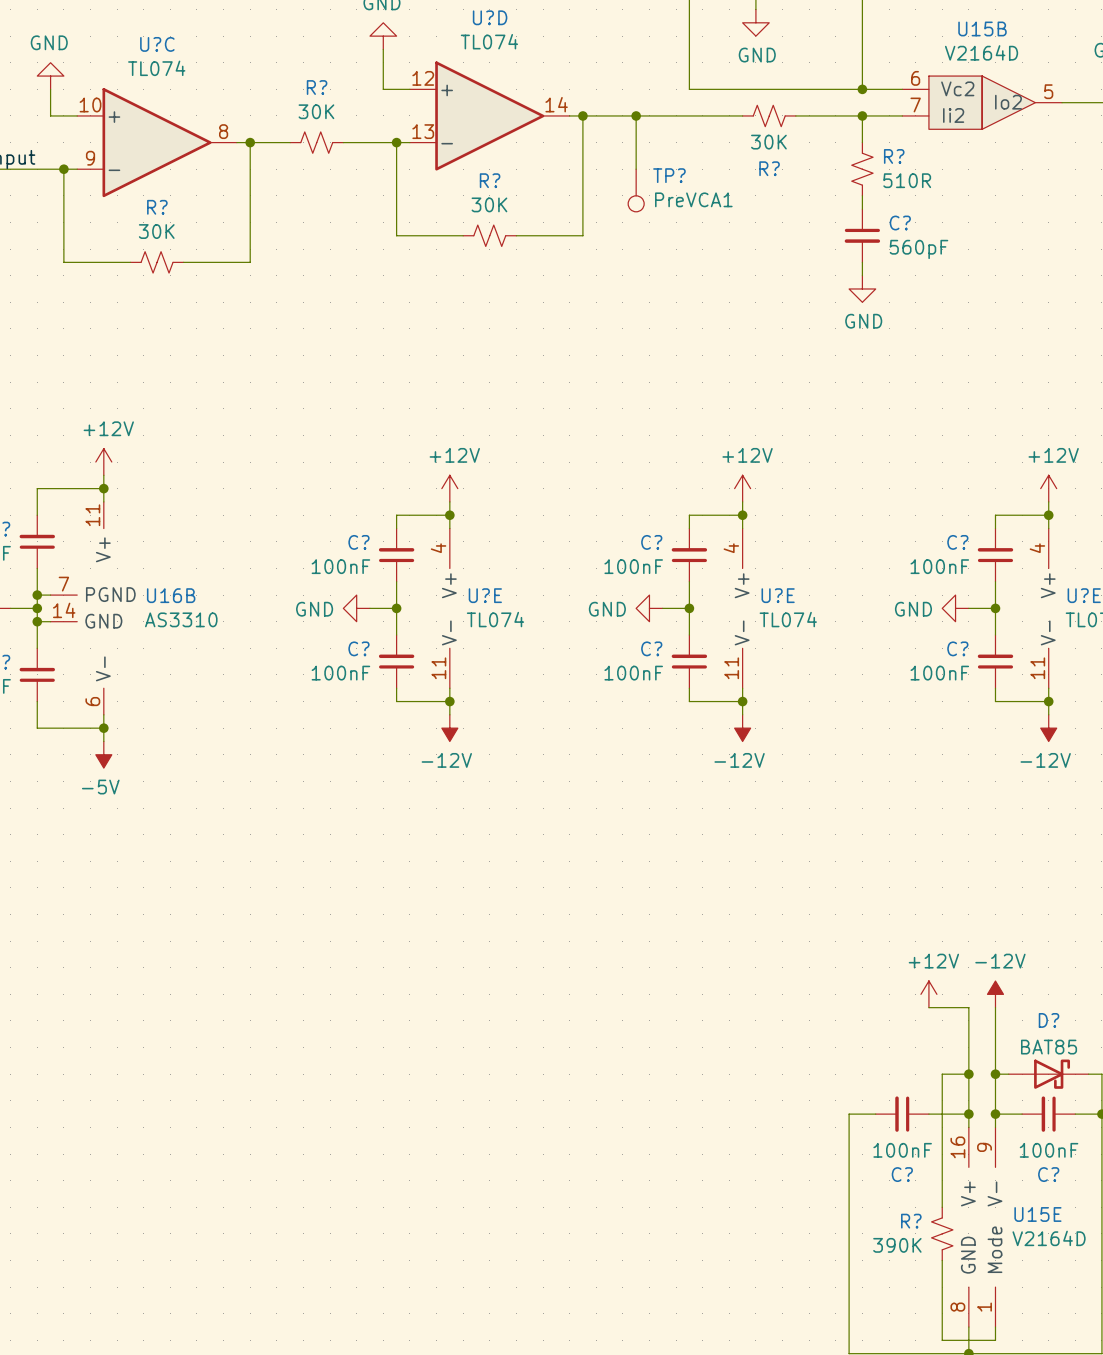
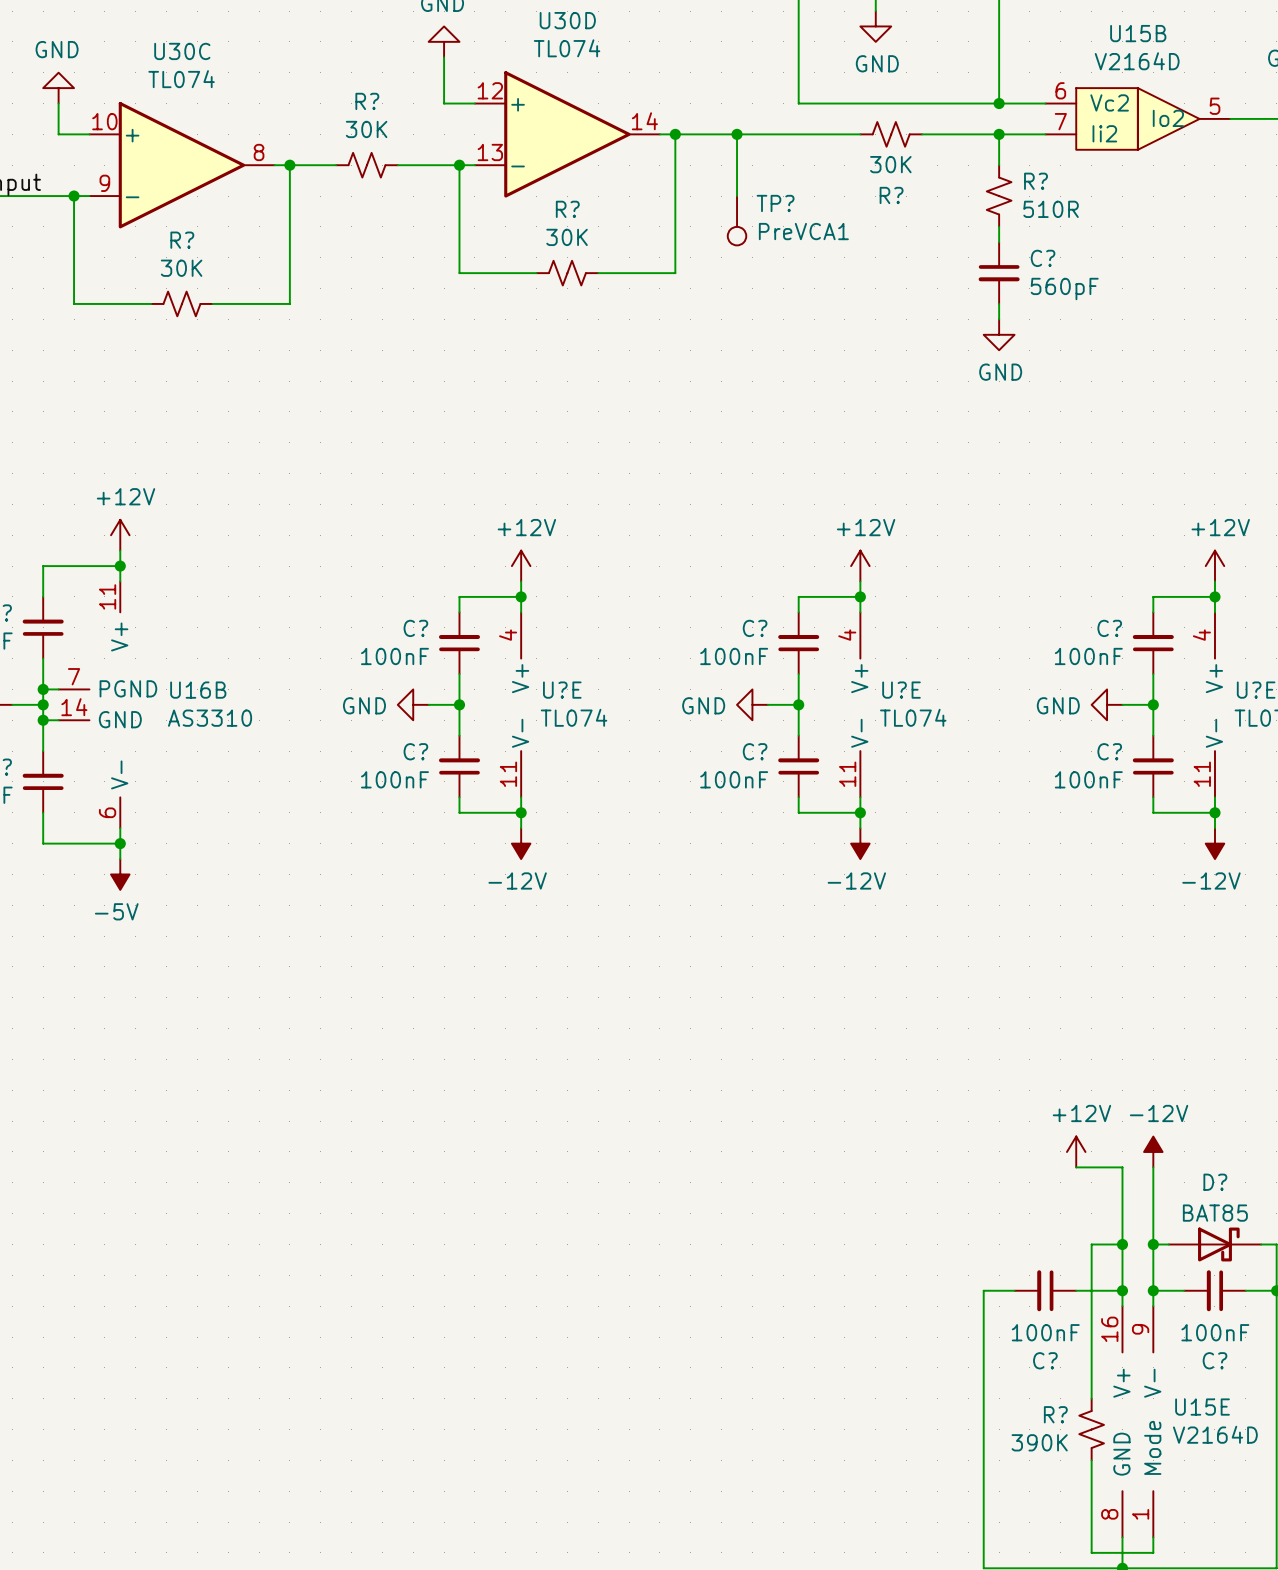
U?D name: U?D (490, 17) -> U30D (567, 20)
U?C name: U?C (157, 44) -> U30C (182, 51)

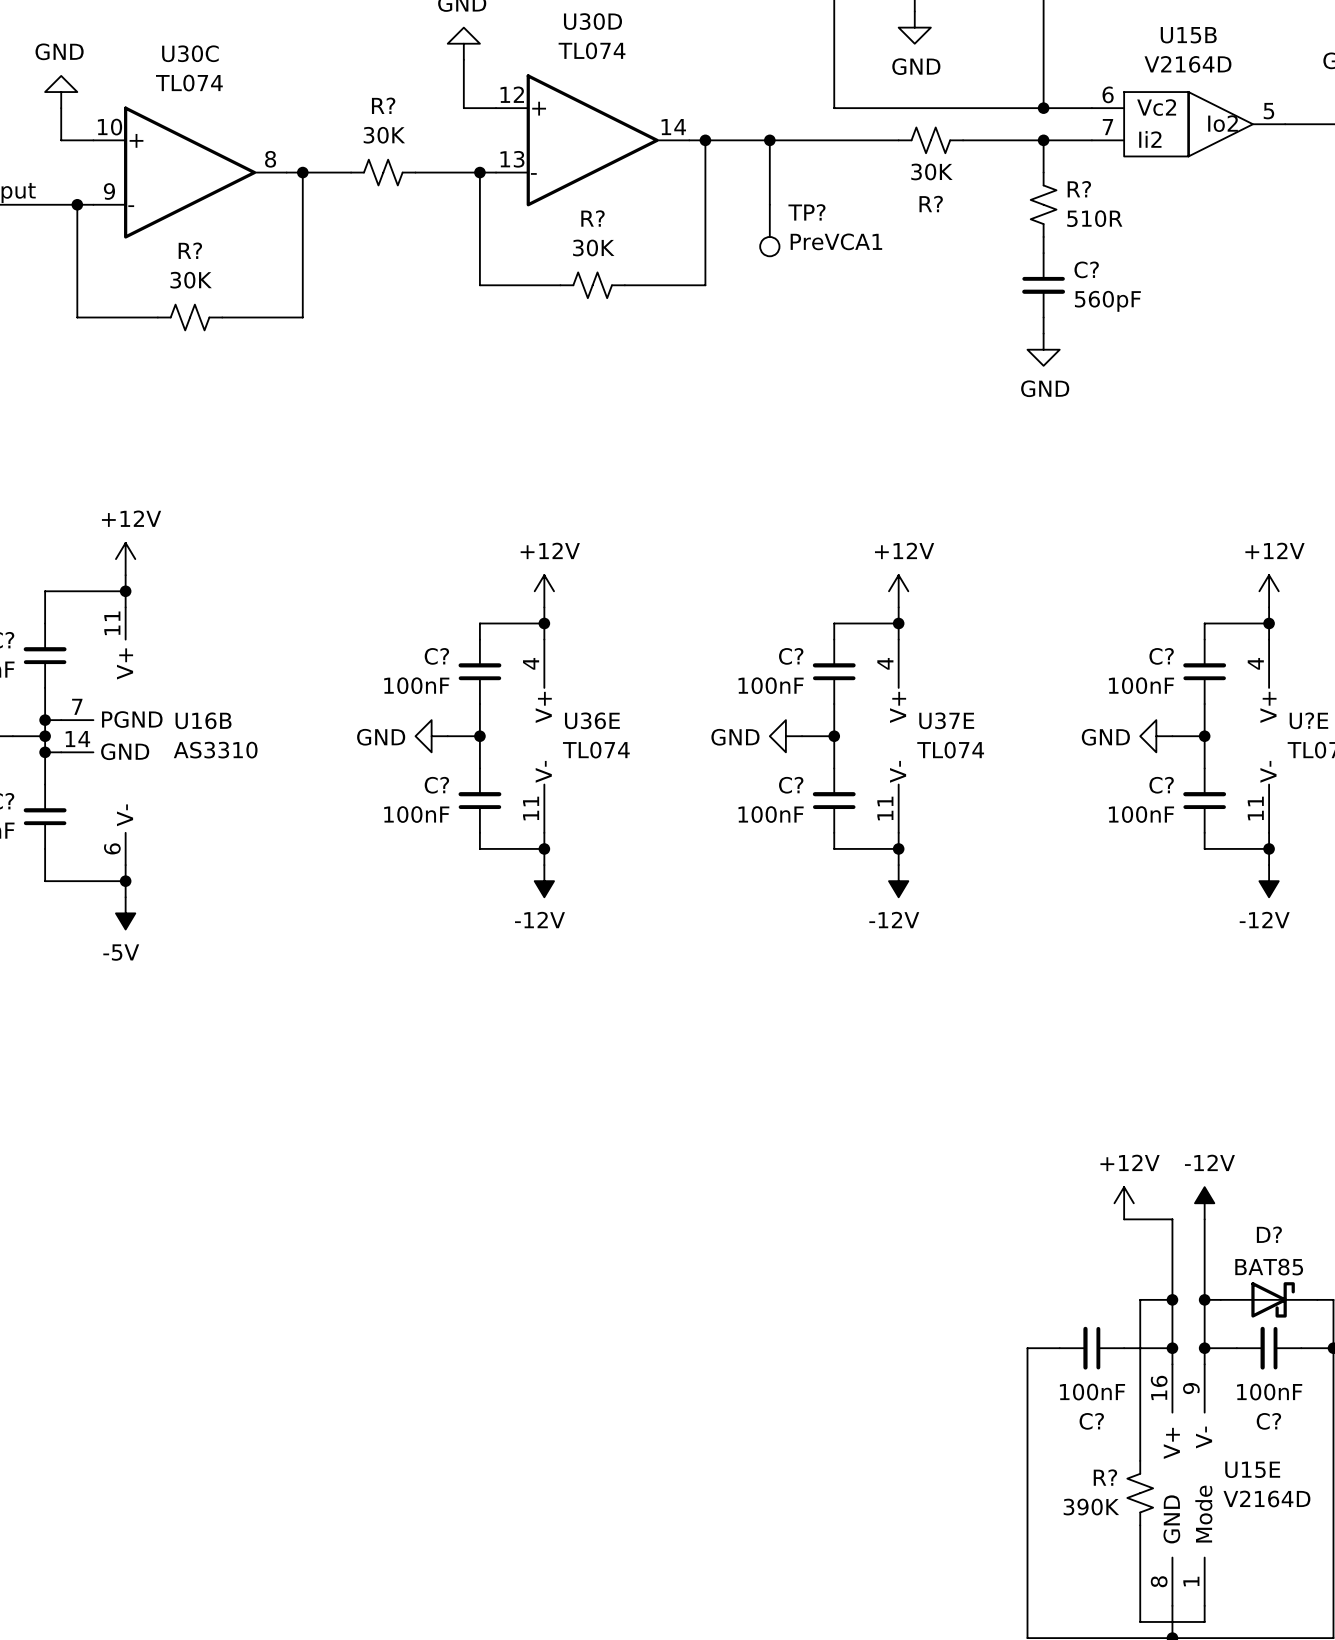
U?E name: U?E (562, 690) -> U36E (592, 720)
U?E name: U?E (901, 690) -> U37E (946, 720)

